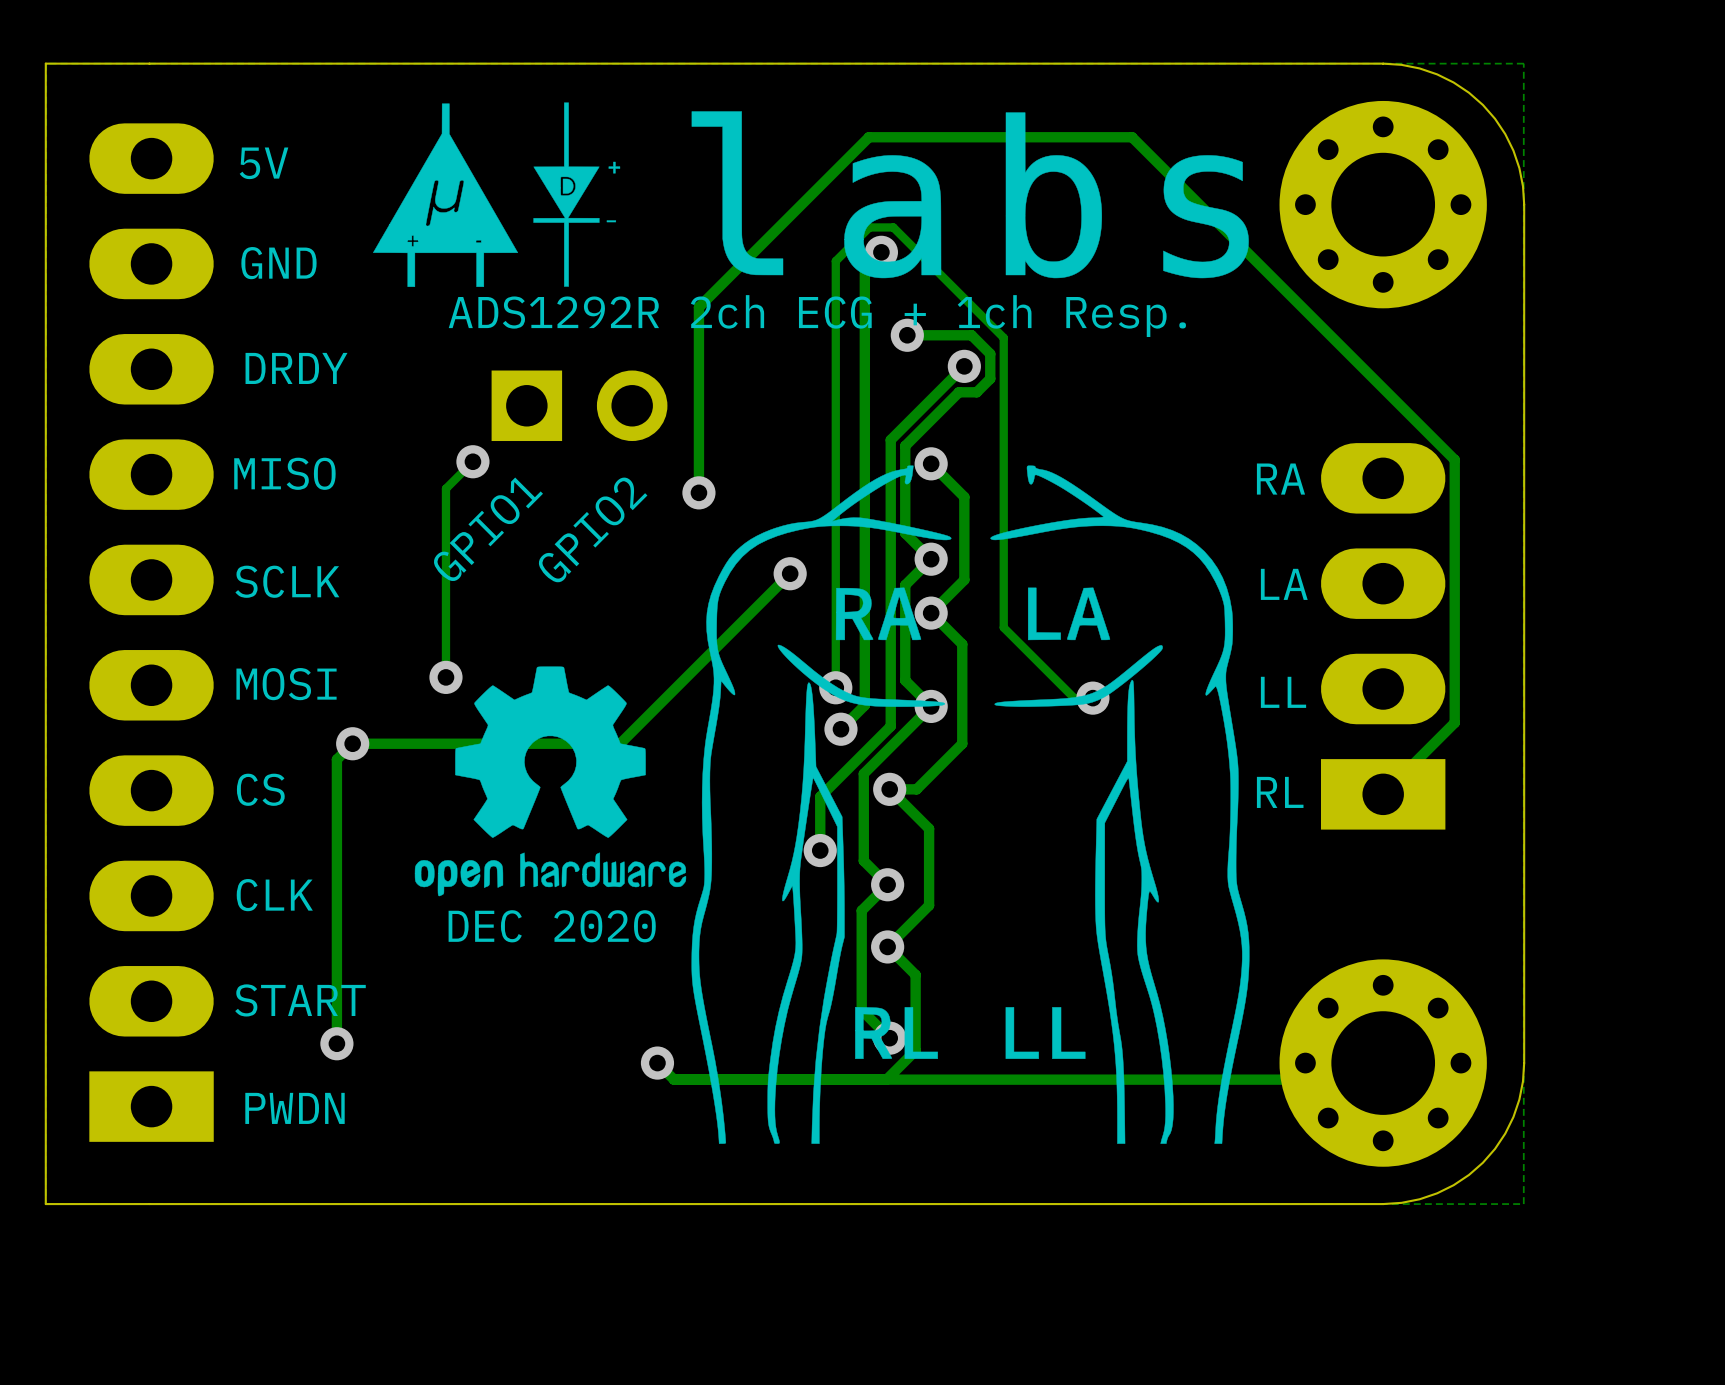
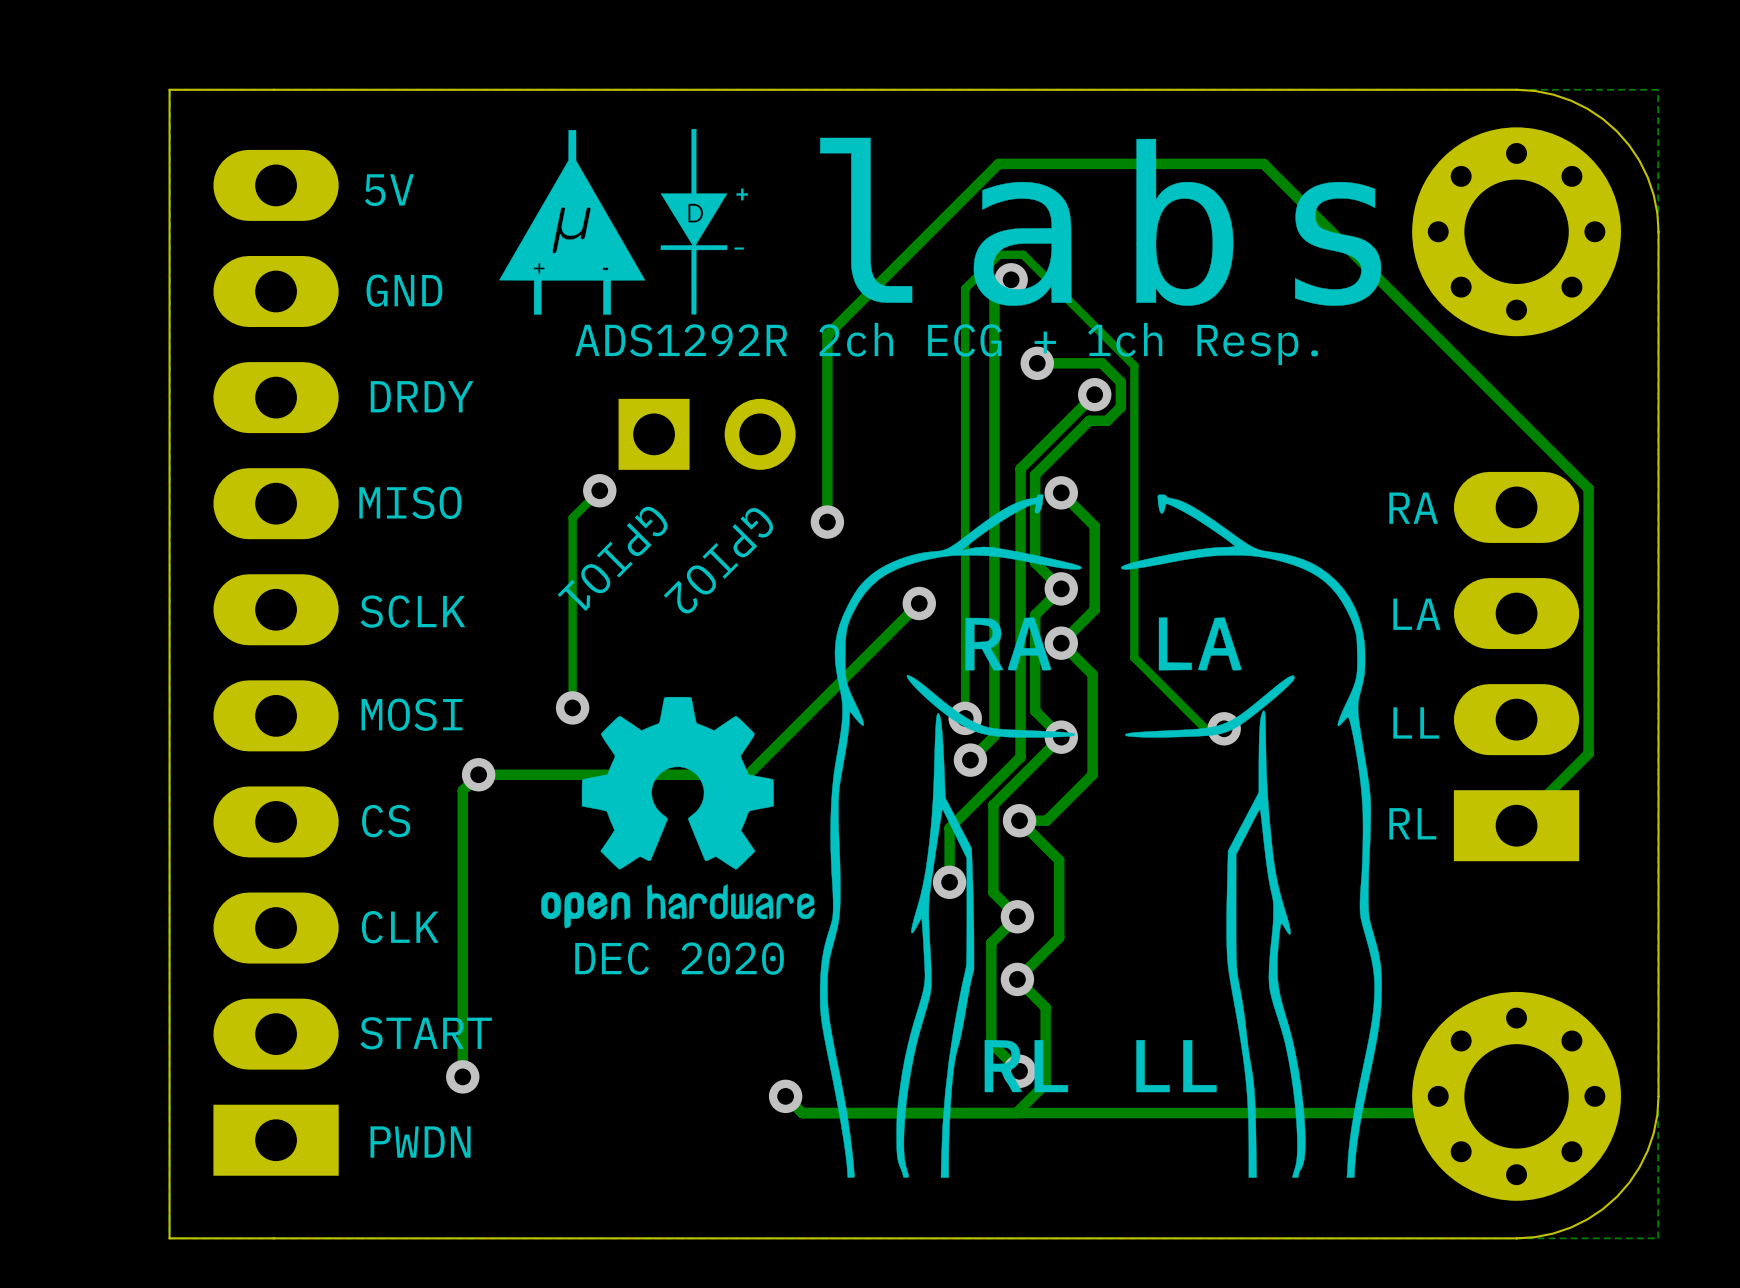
text rotation: 0° (488, 529) -> 180° (612, 558)
text rotation: 0° (592, 530) -> 180° (718, 560)

